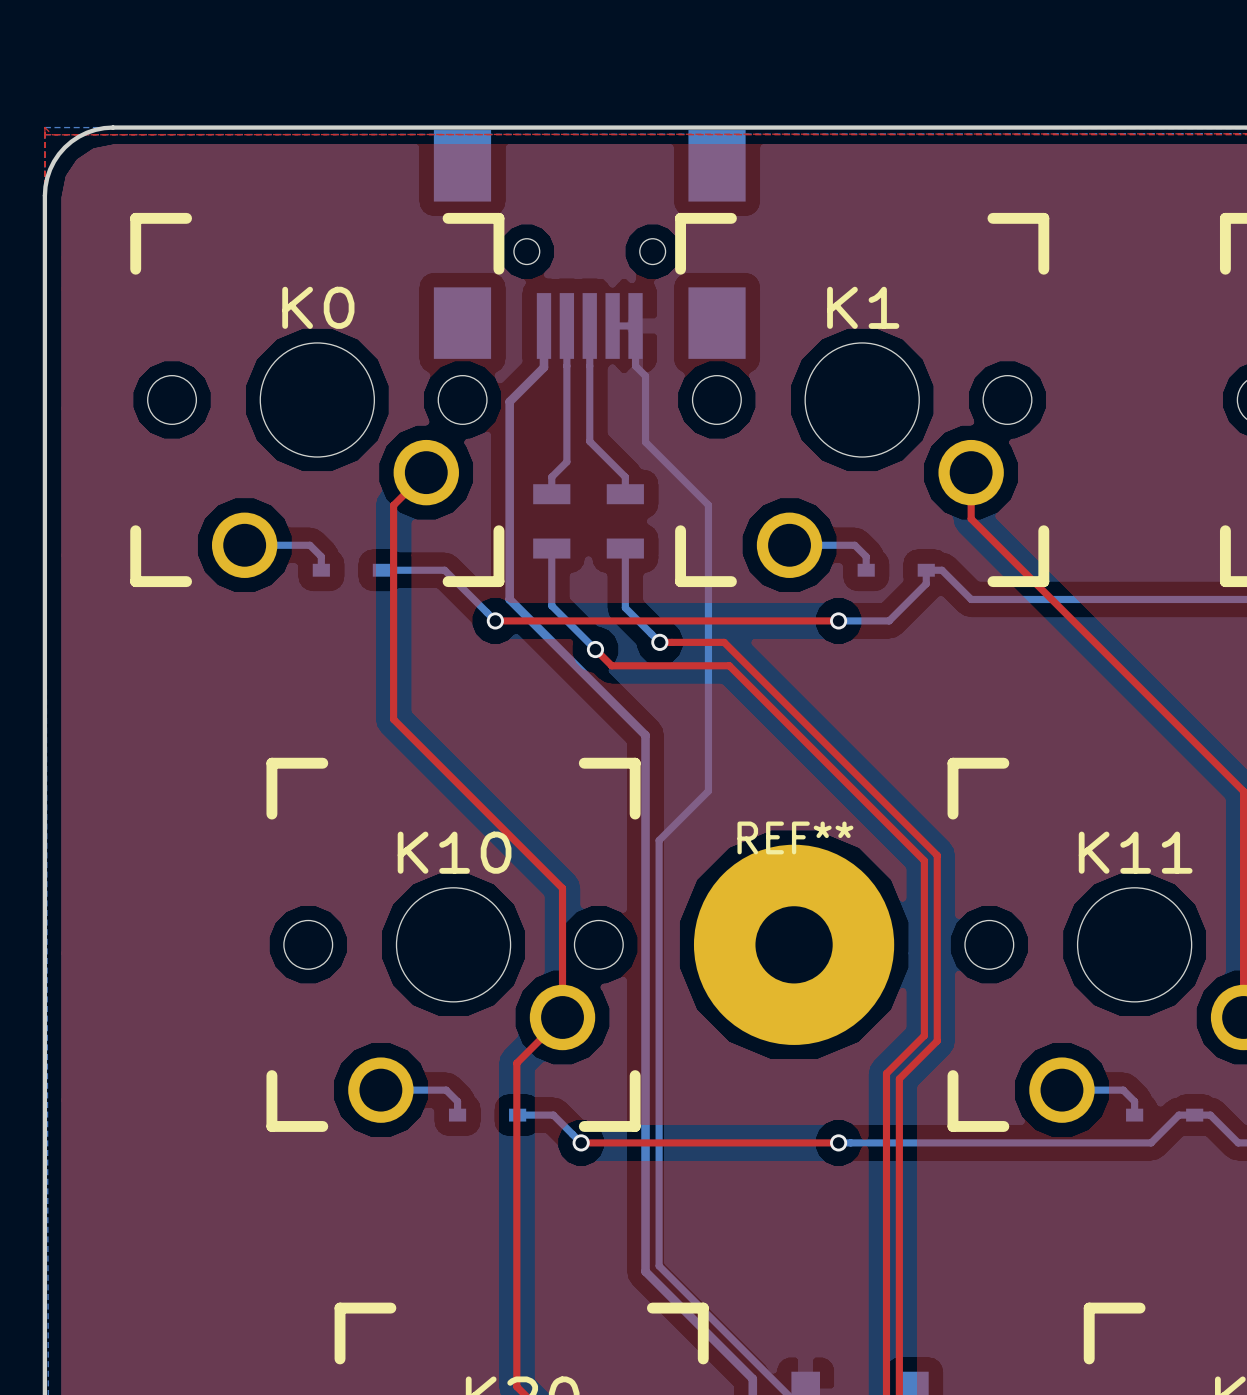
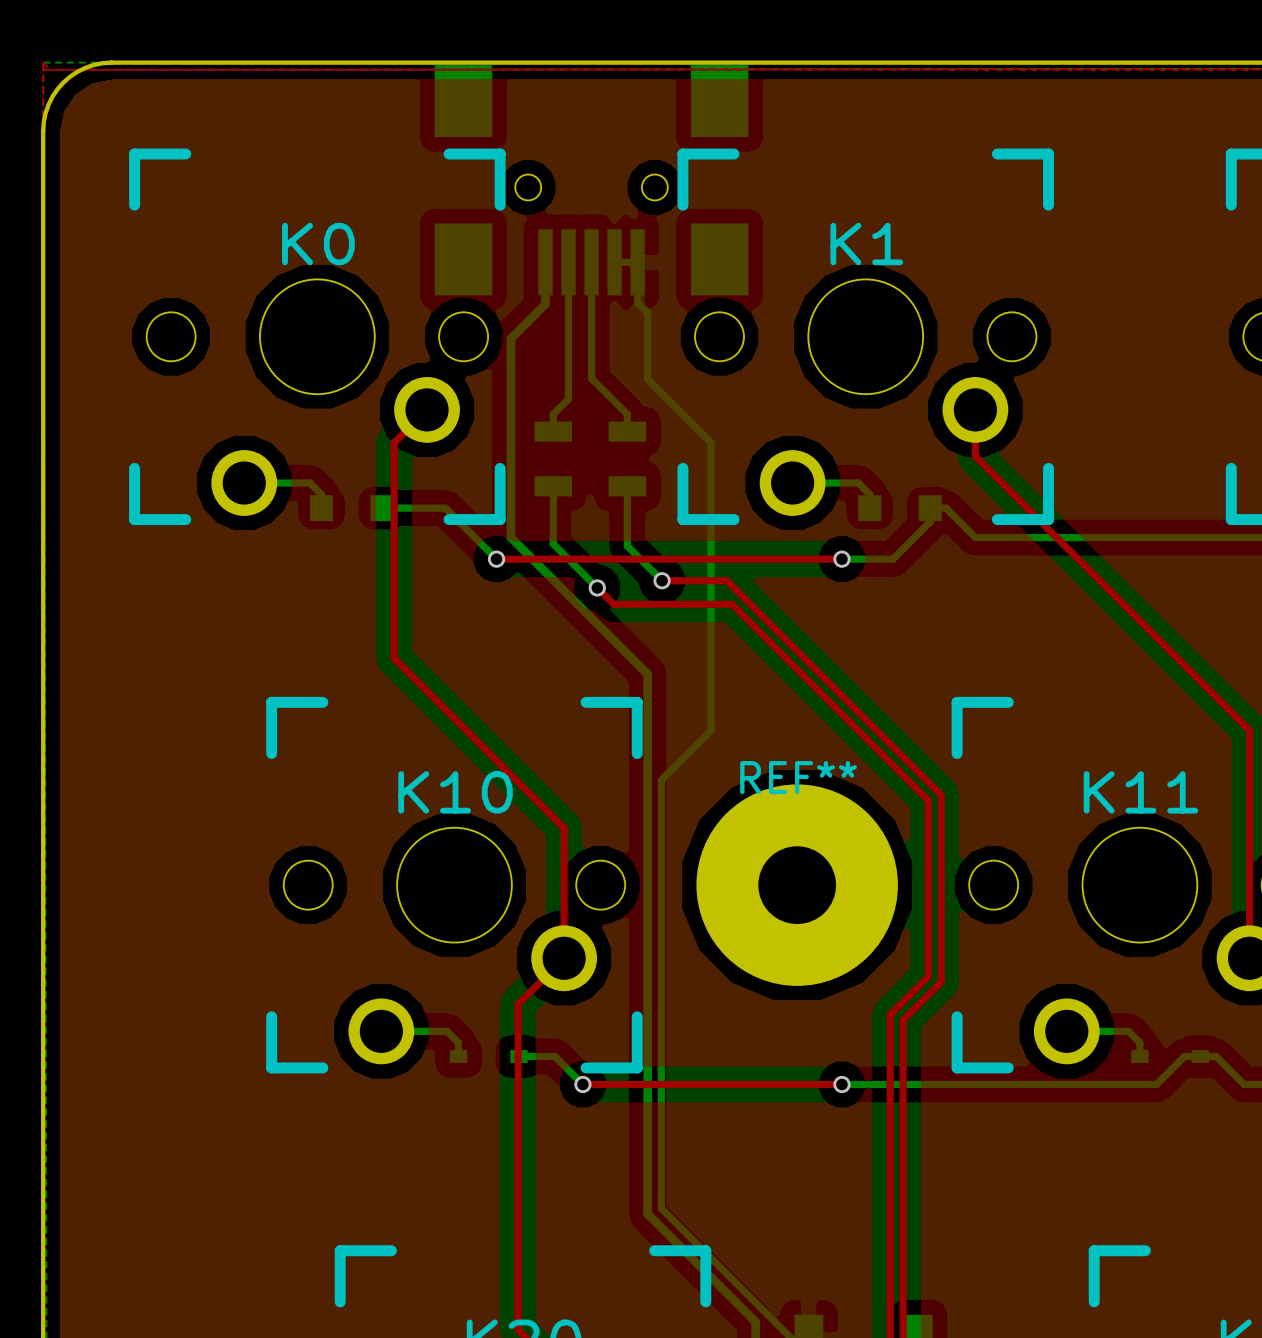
part footprint: [312, 563, 390, 577] -> [309, 495, 394, 522]
part footprint: [857, 563, 935, 577] -> [858, 495, 942, 522]

